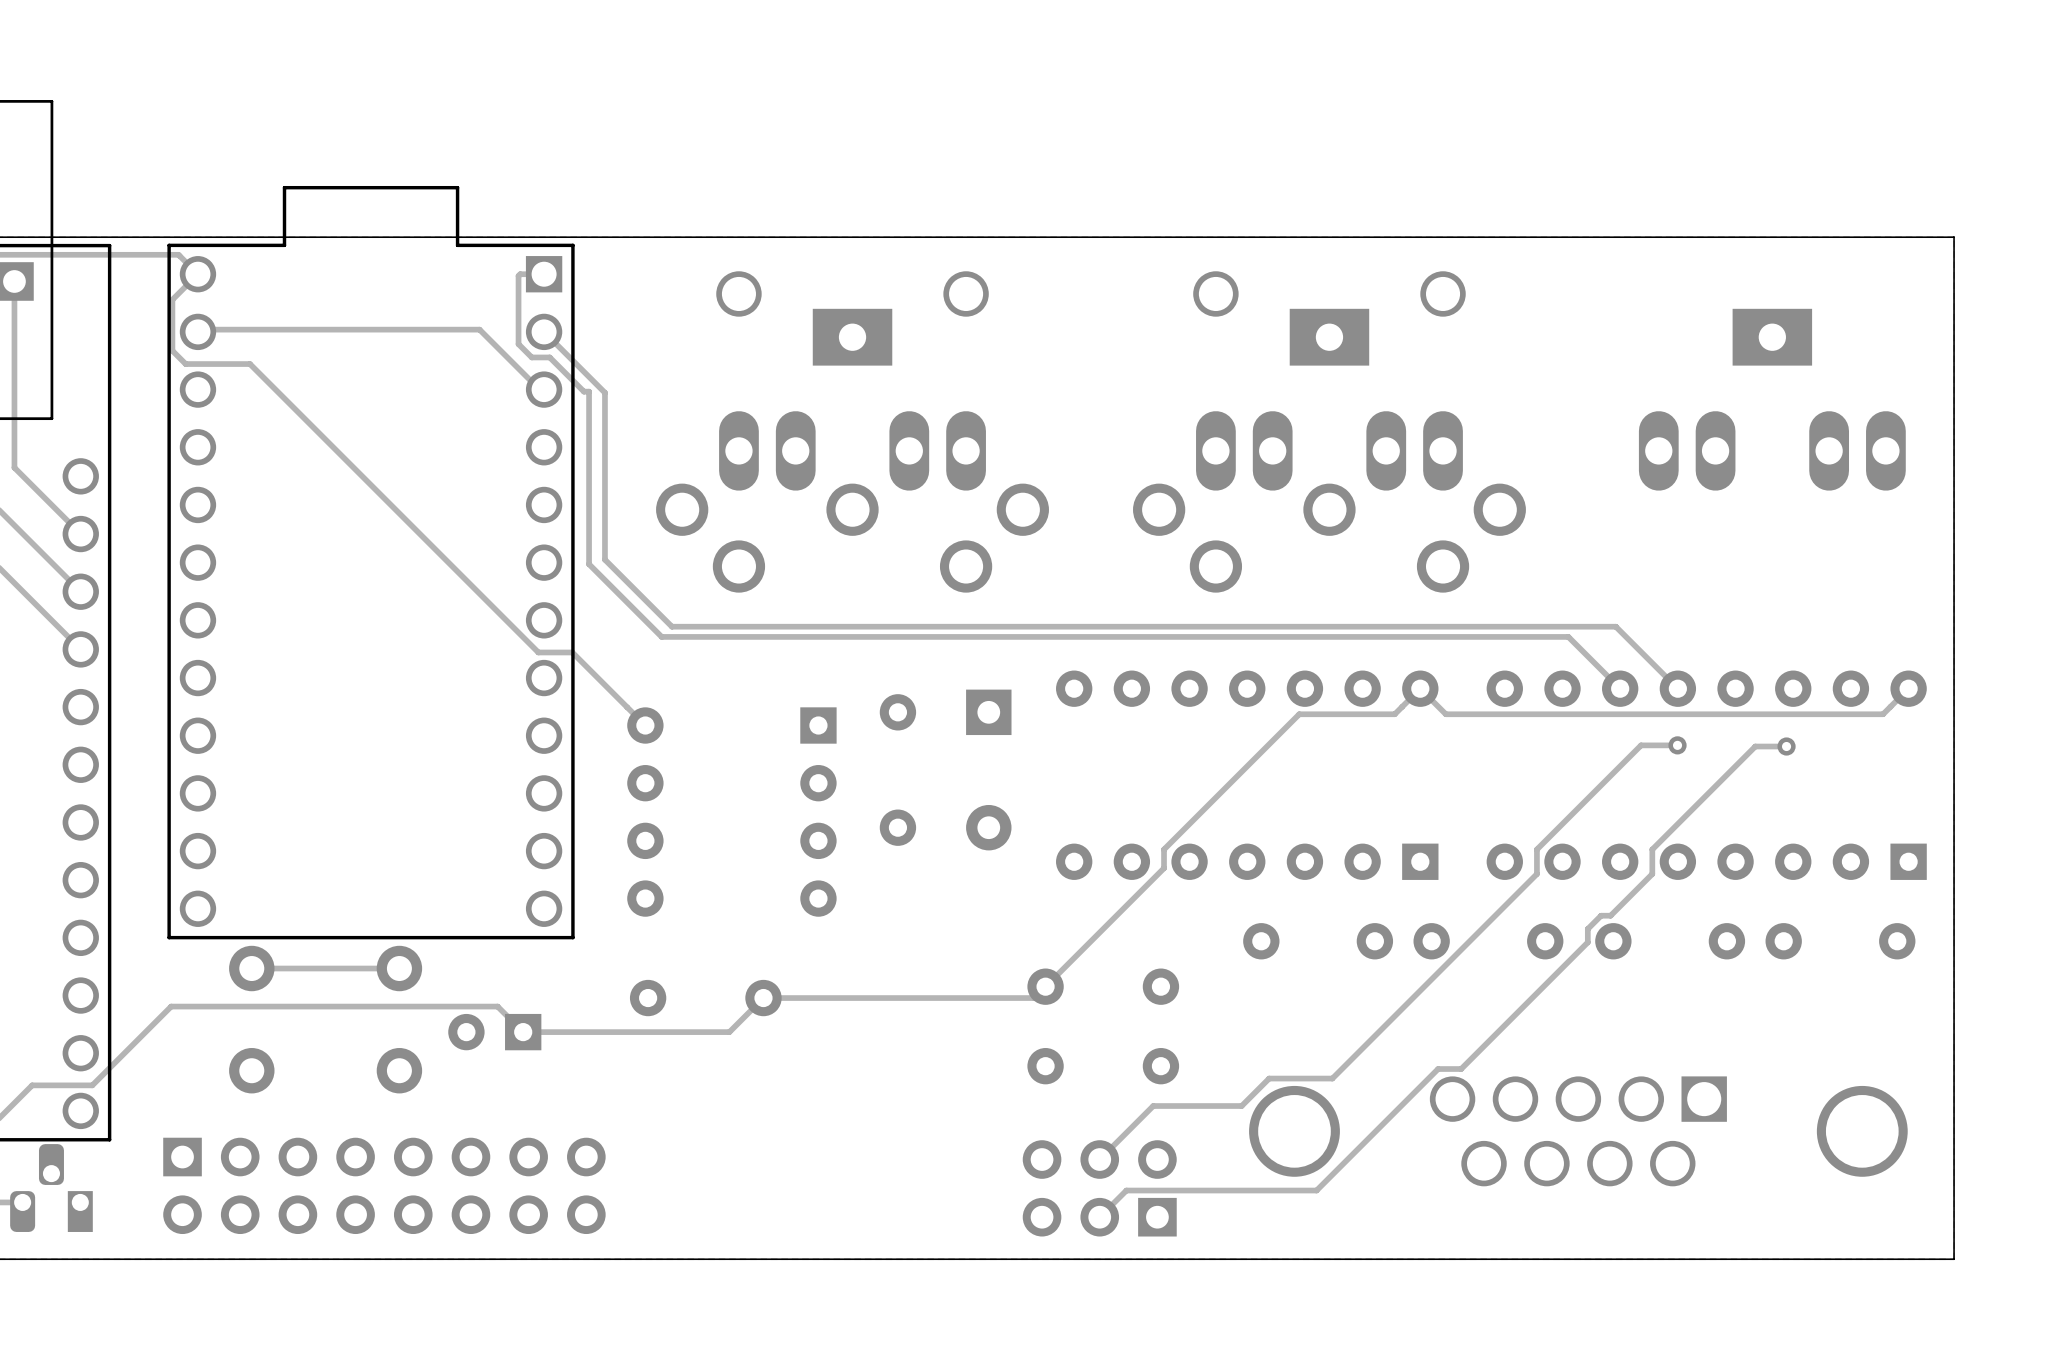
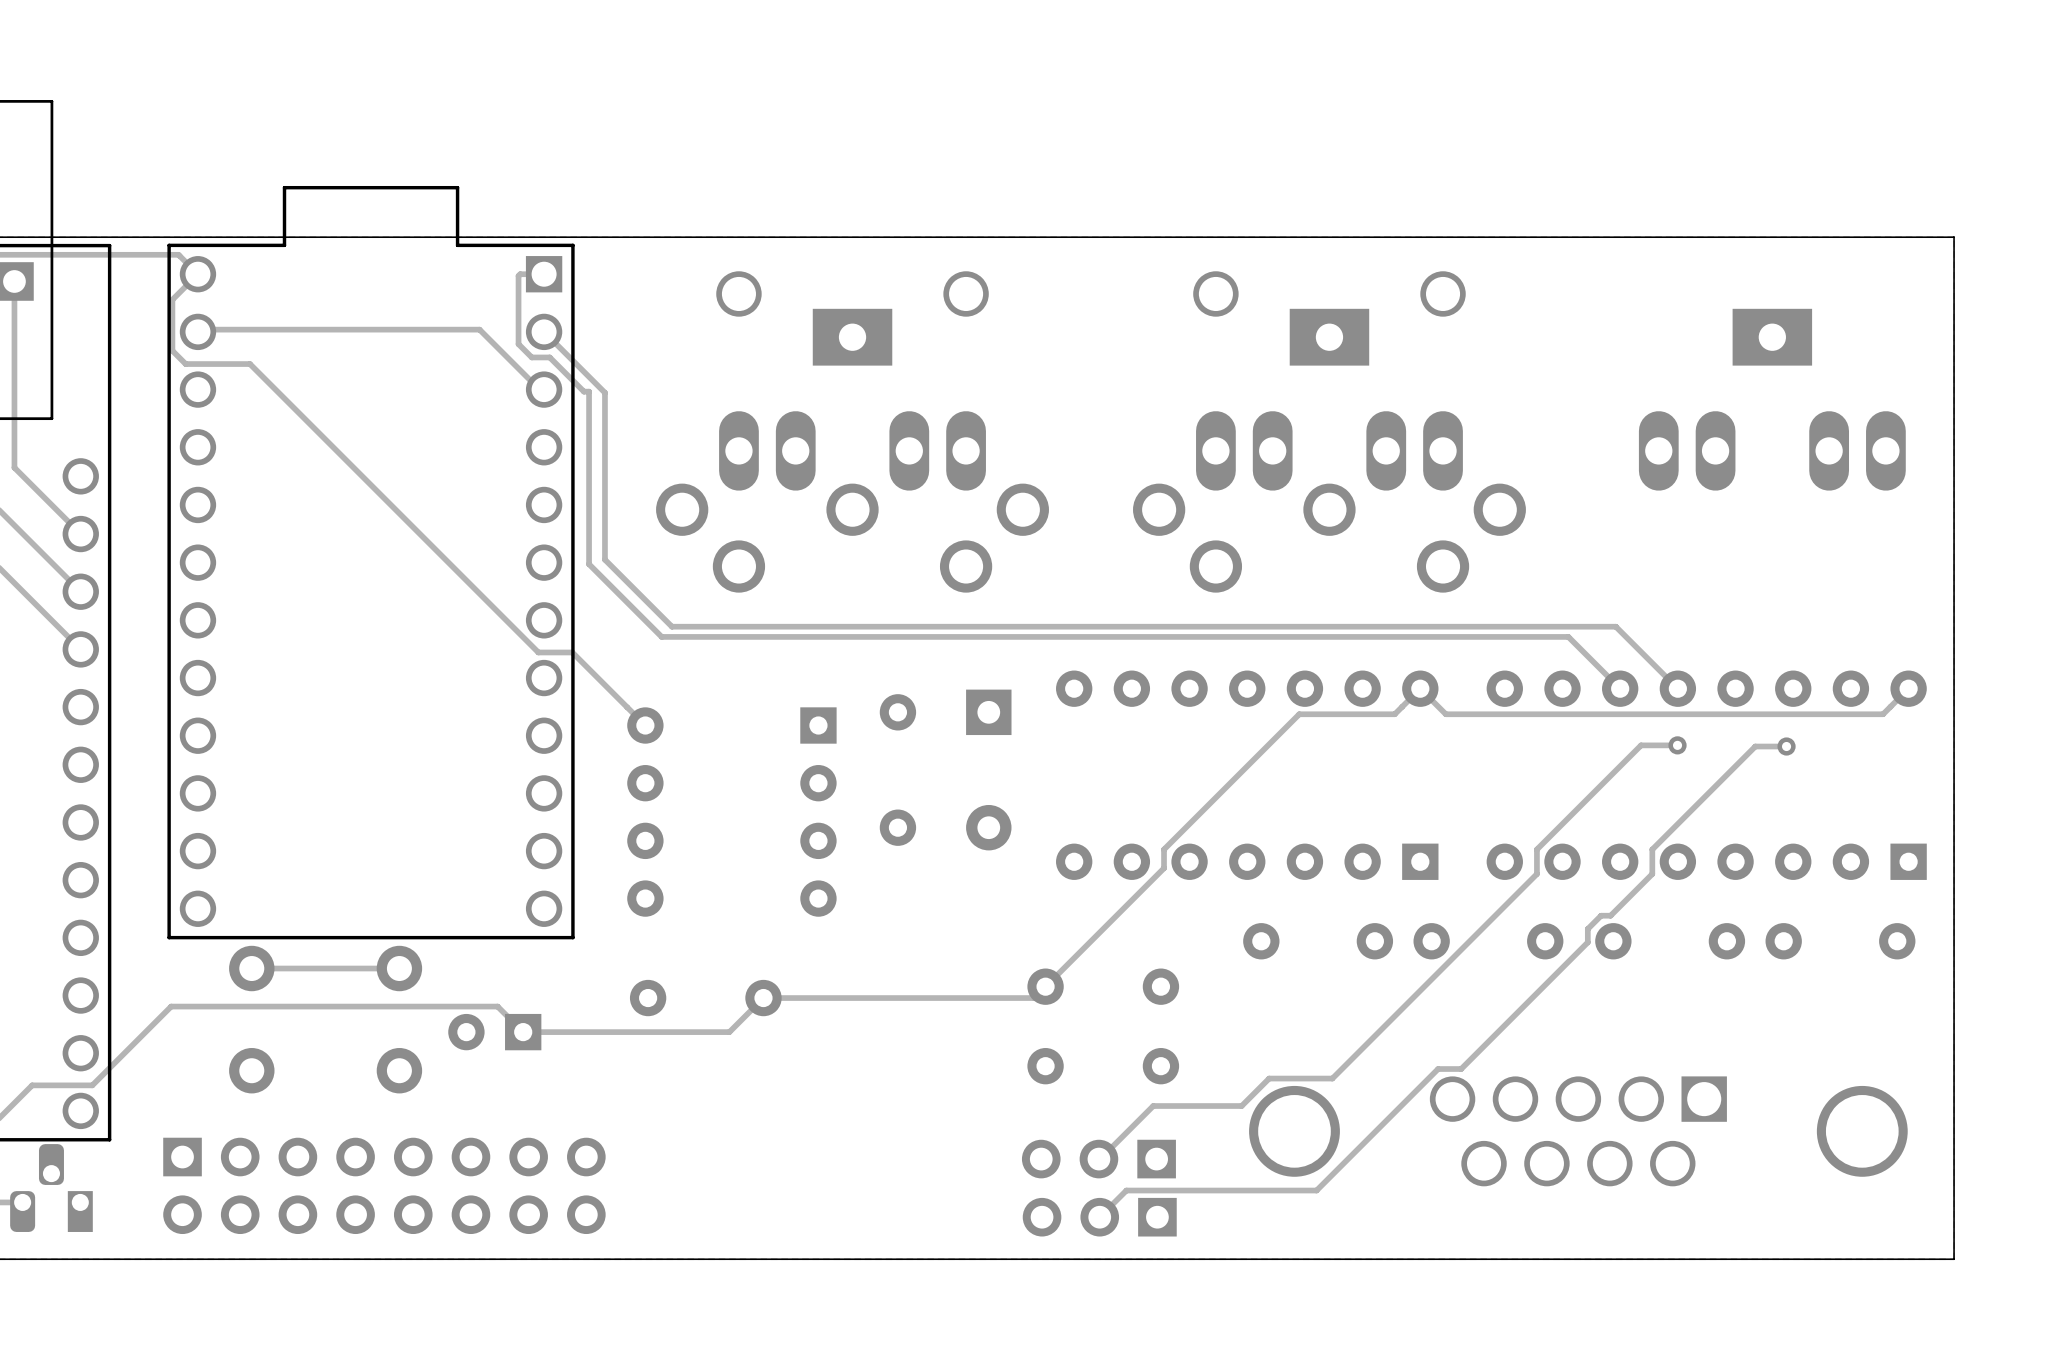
part: none -> (1098, 1159)
part: (1099, 1188) -> none

